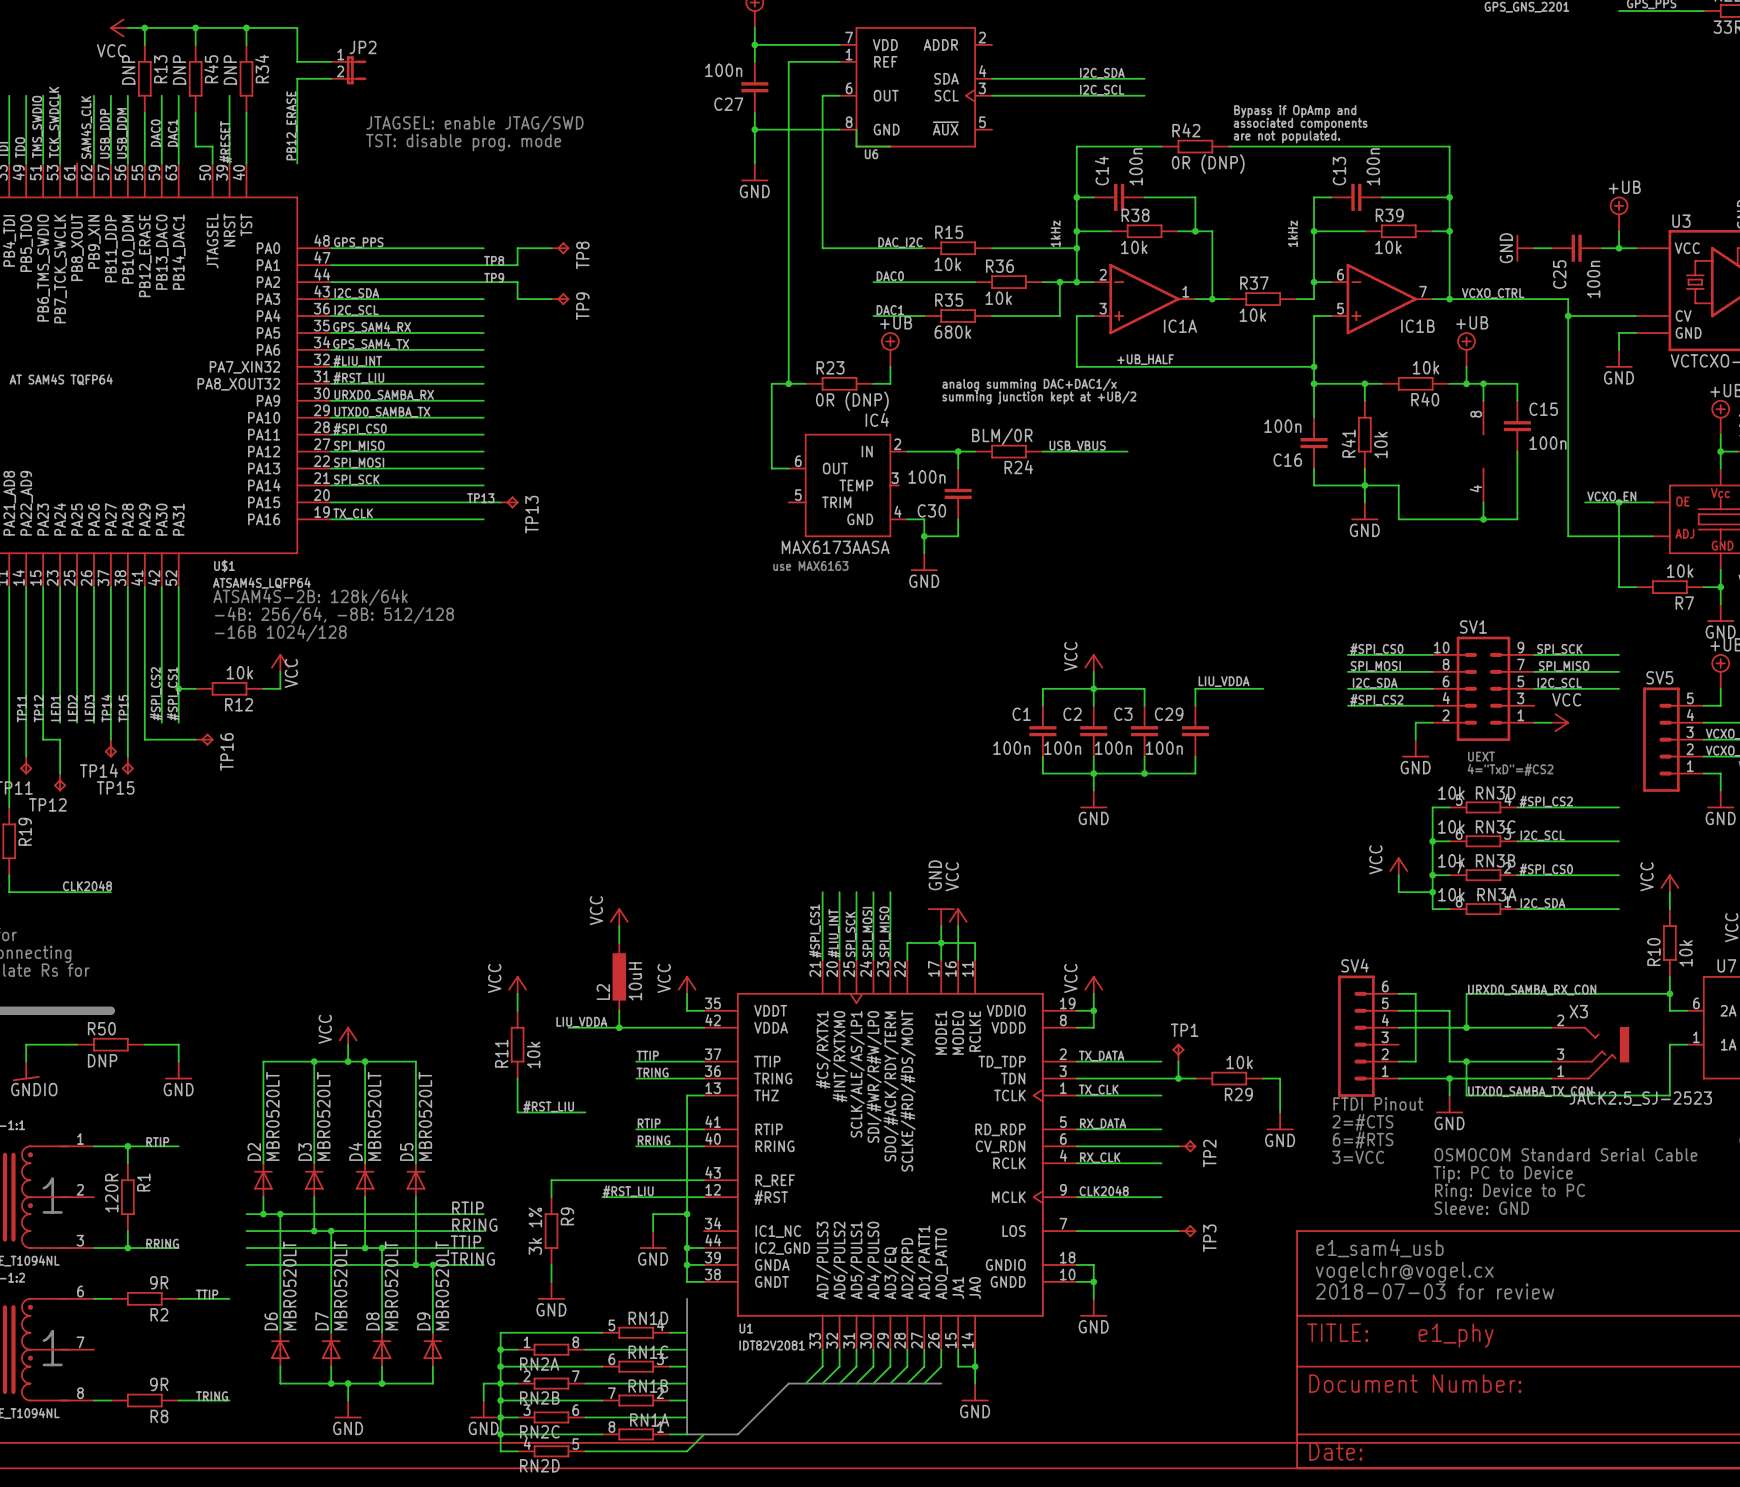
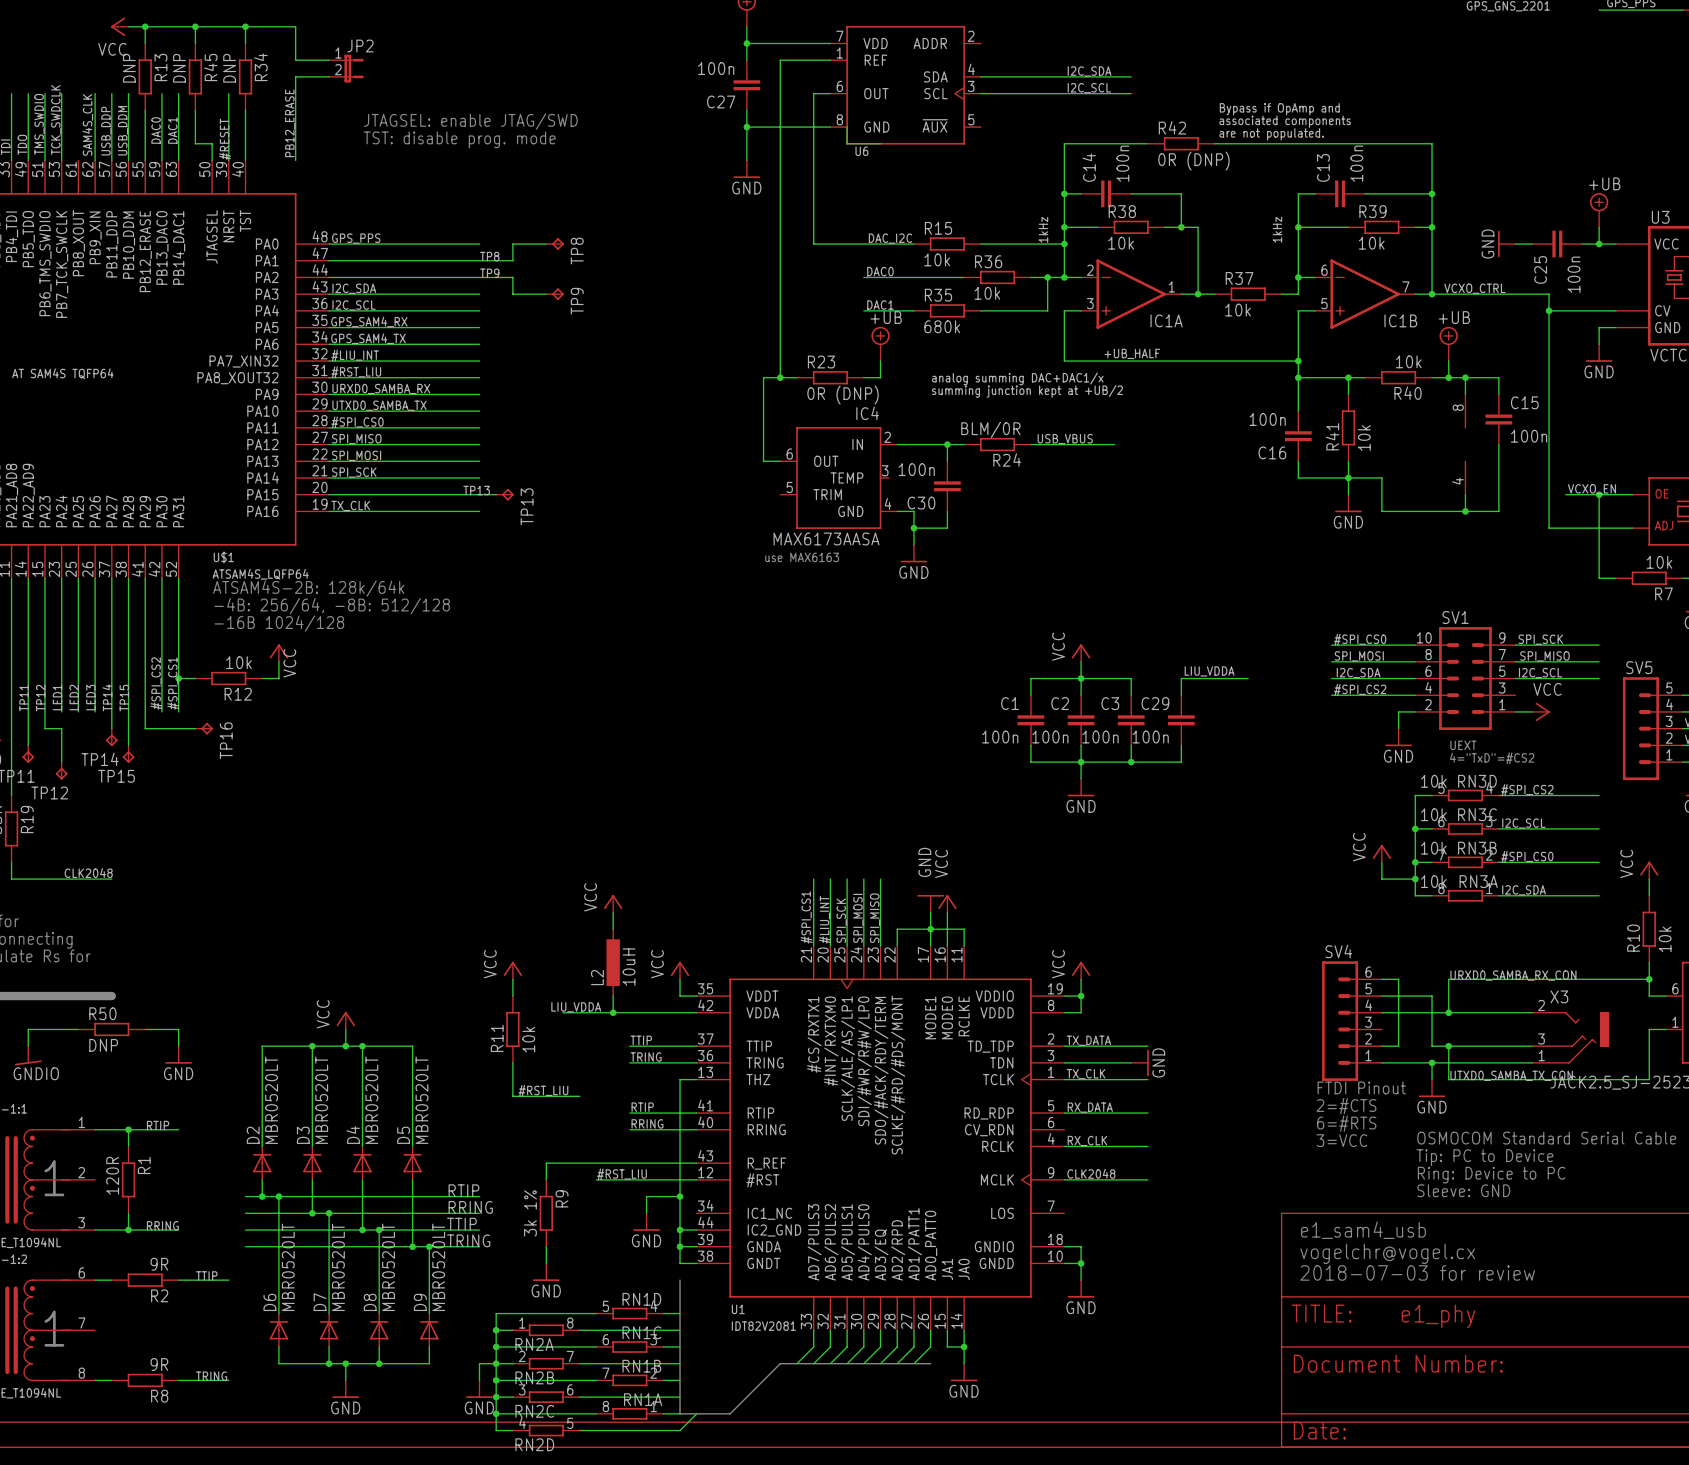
TP1: (1178, 1052) -> none
wire: (1178, 1061) (1178, 1078) -> none
wire: (1144, 1078) (1195, 1078) -> none
junction: (1178, 1078) -> none
R29: 10k (1229, 1078) -> none
wire: (1263, 1078) (1280, 1078) (1280, 1112) -> none
power symbol position: GND (1280, 1121) -> GND (1139, 1062)
power symbol rotation: 0° (1280, 1129) -> 90° counterclockwise (1147, 1062)
wire: (1076, 1146) (1178, 1146) -> none
TP2: (1187, 1146) -> none
wire: (1076, 1231) (1178, 1231) -> none
TP3: (1187, 1231) -> none

